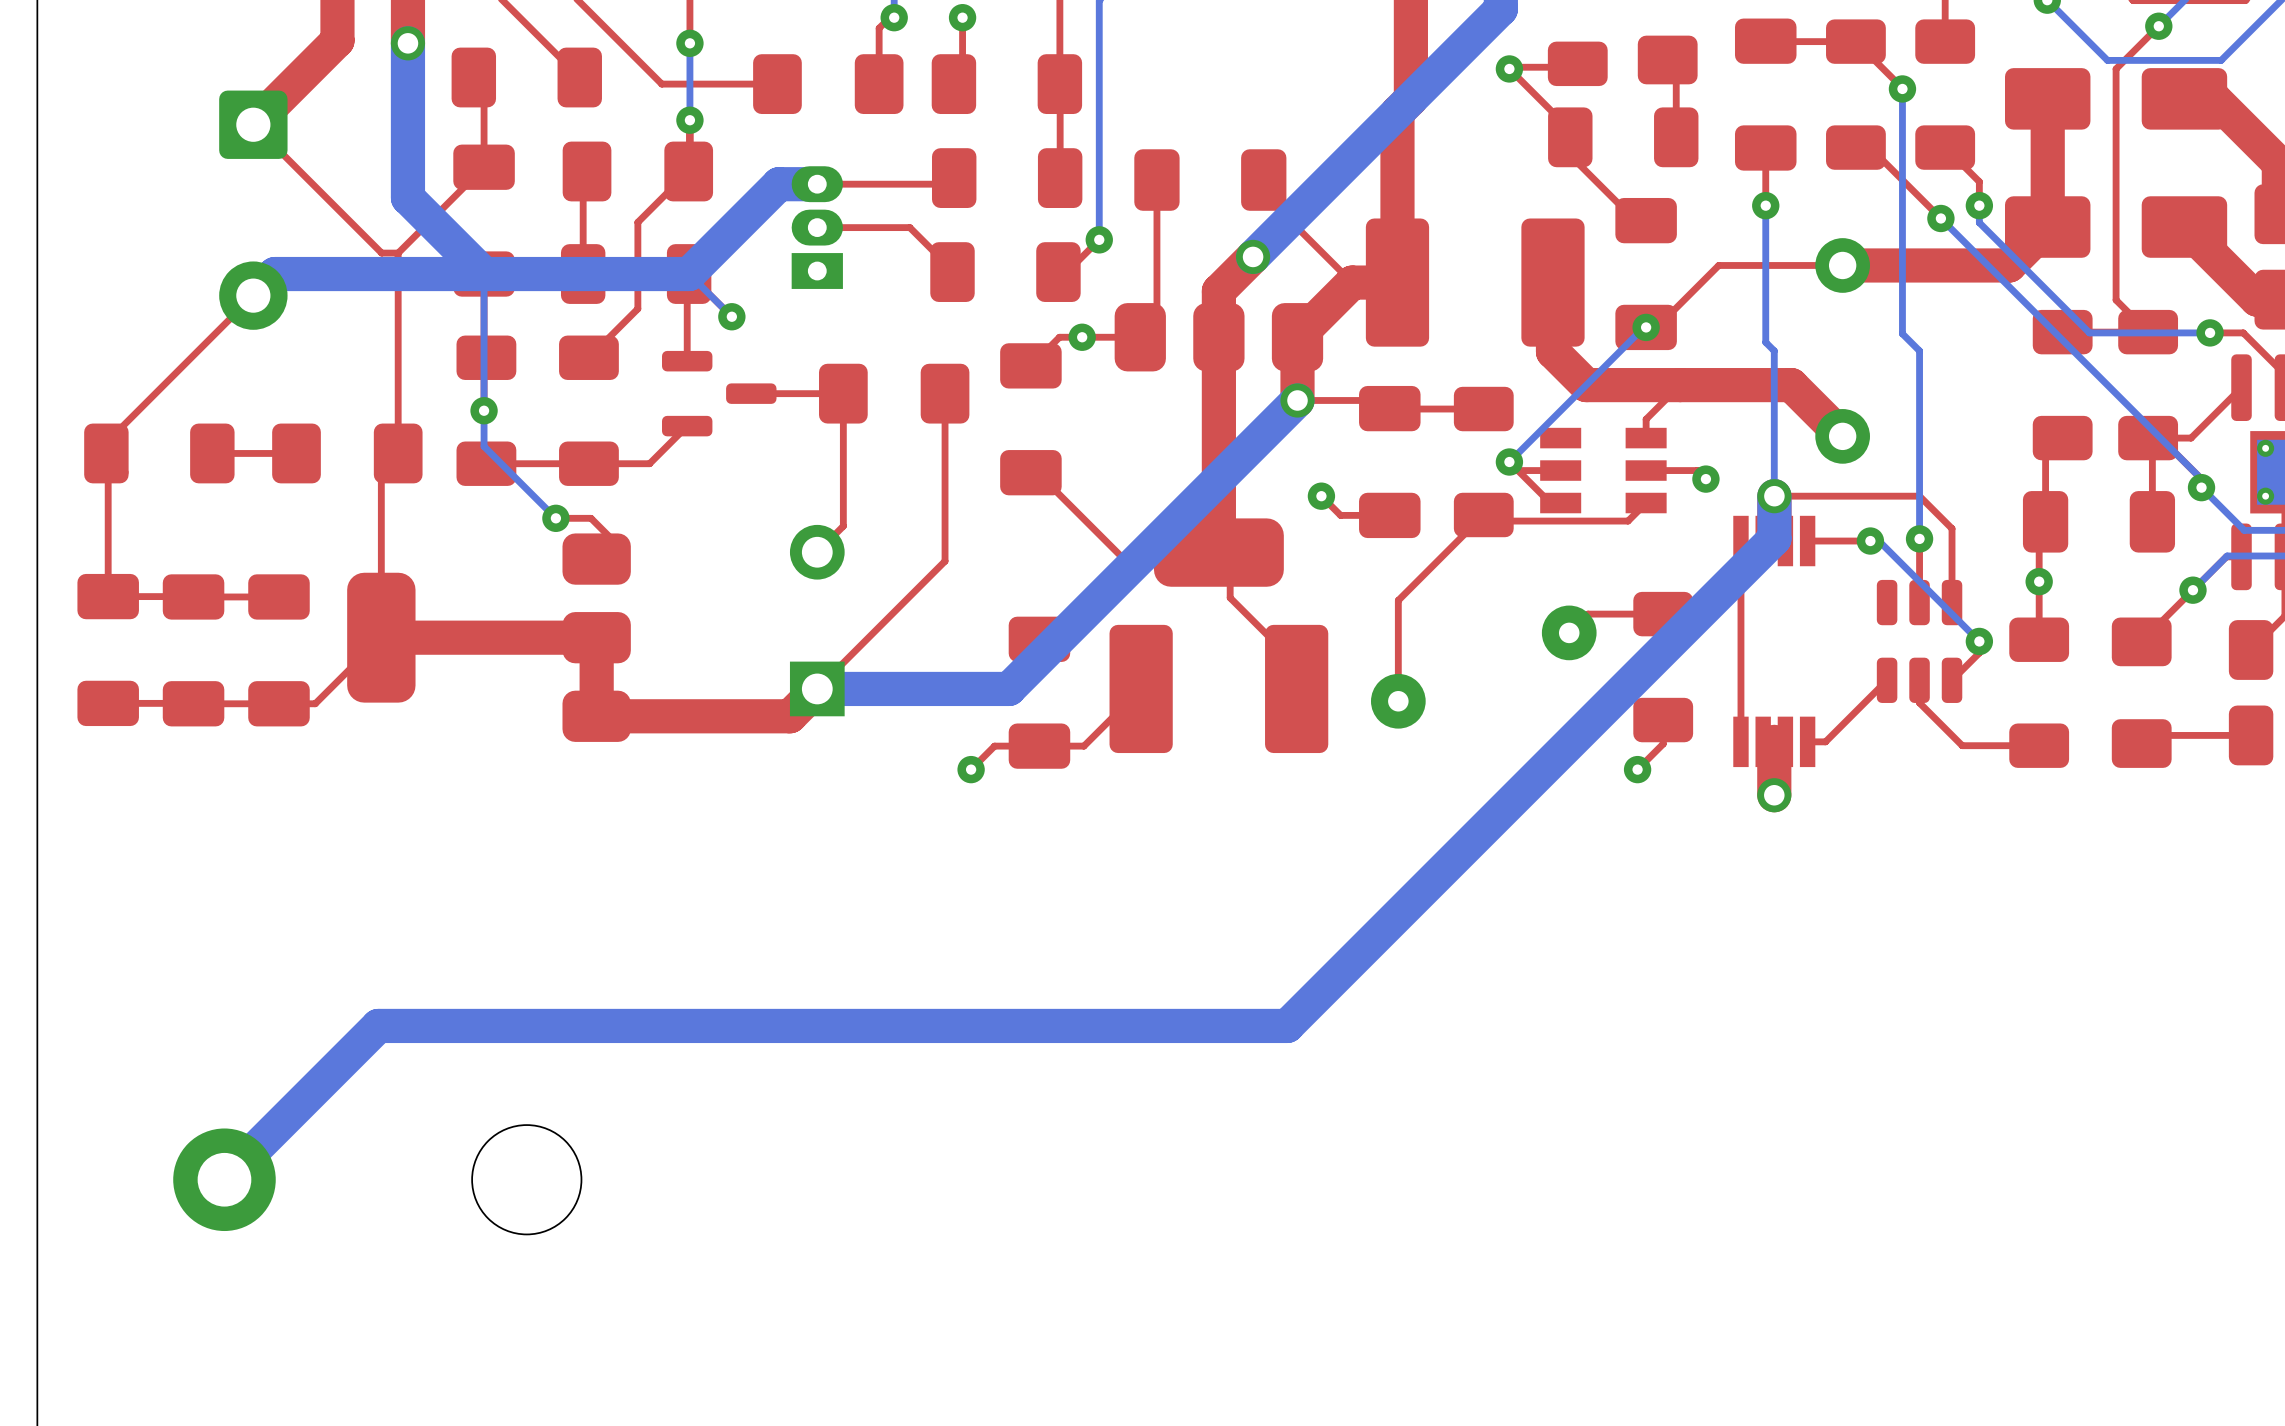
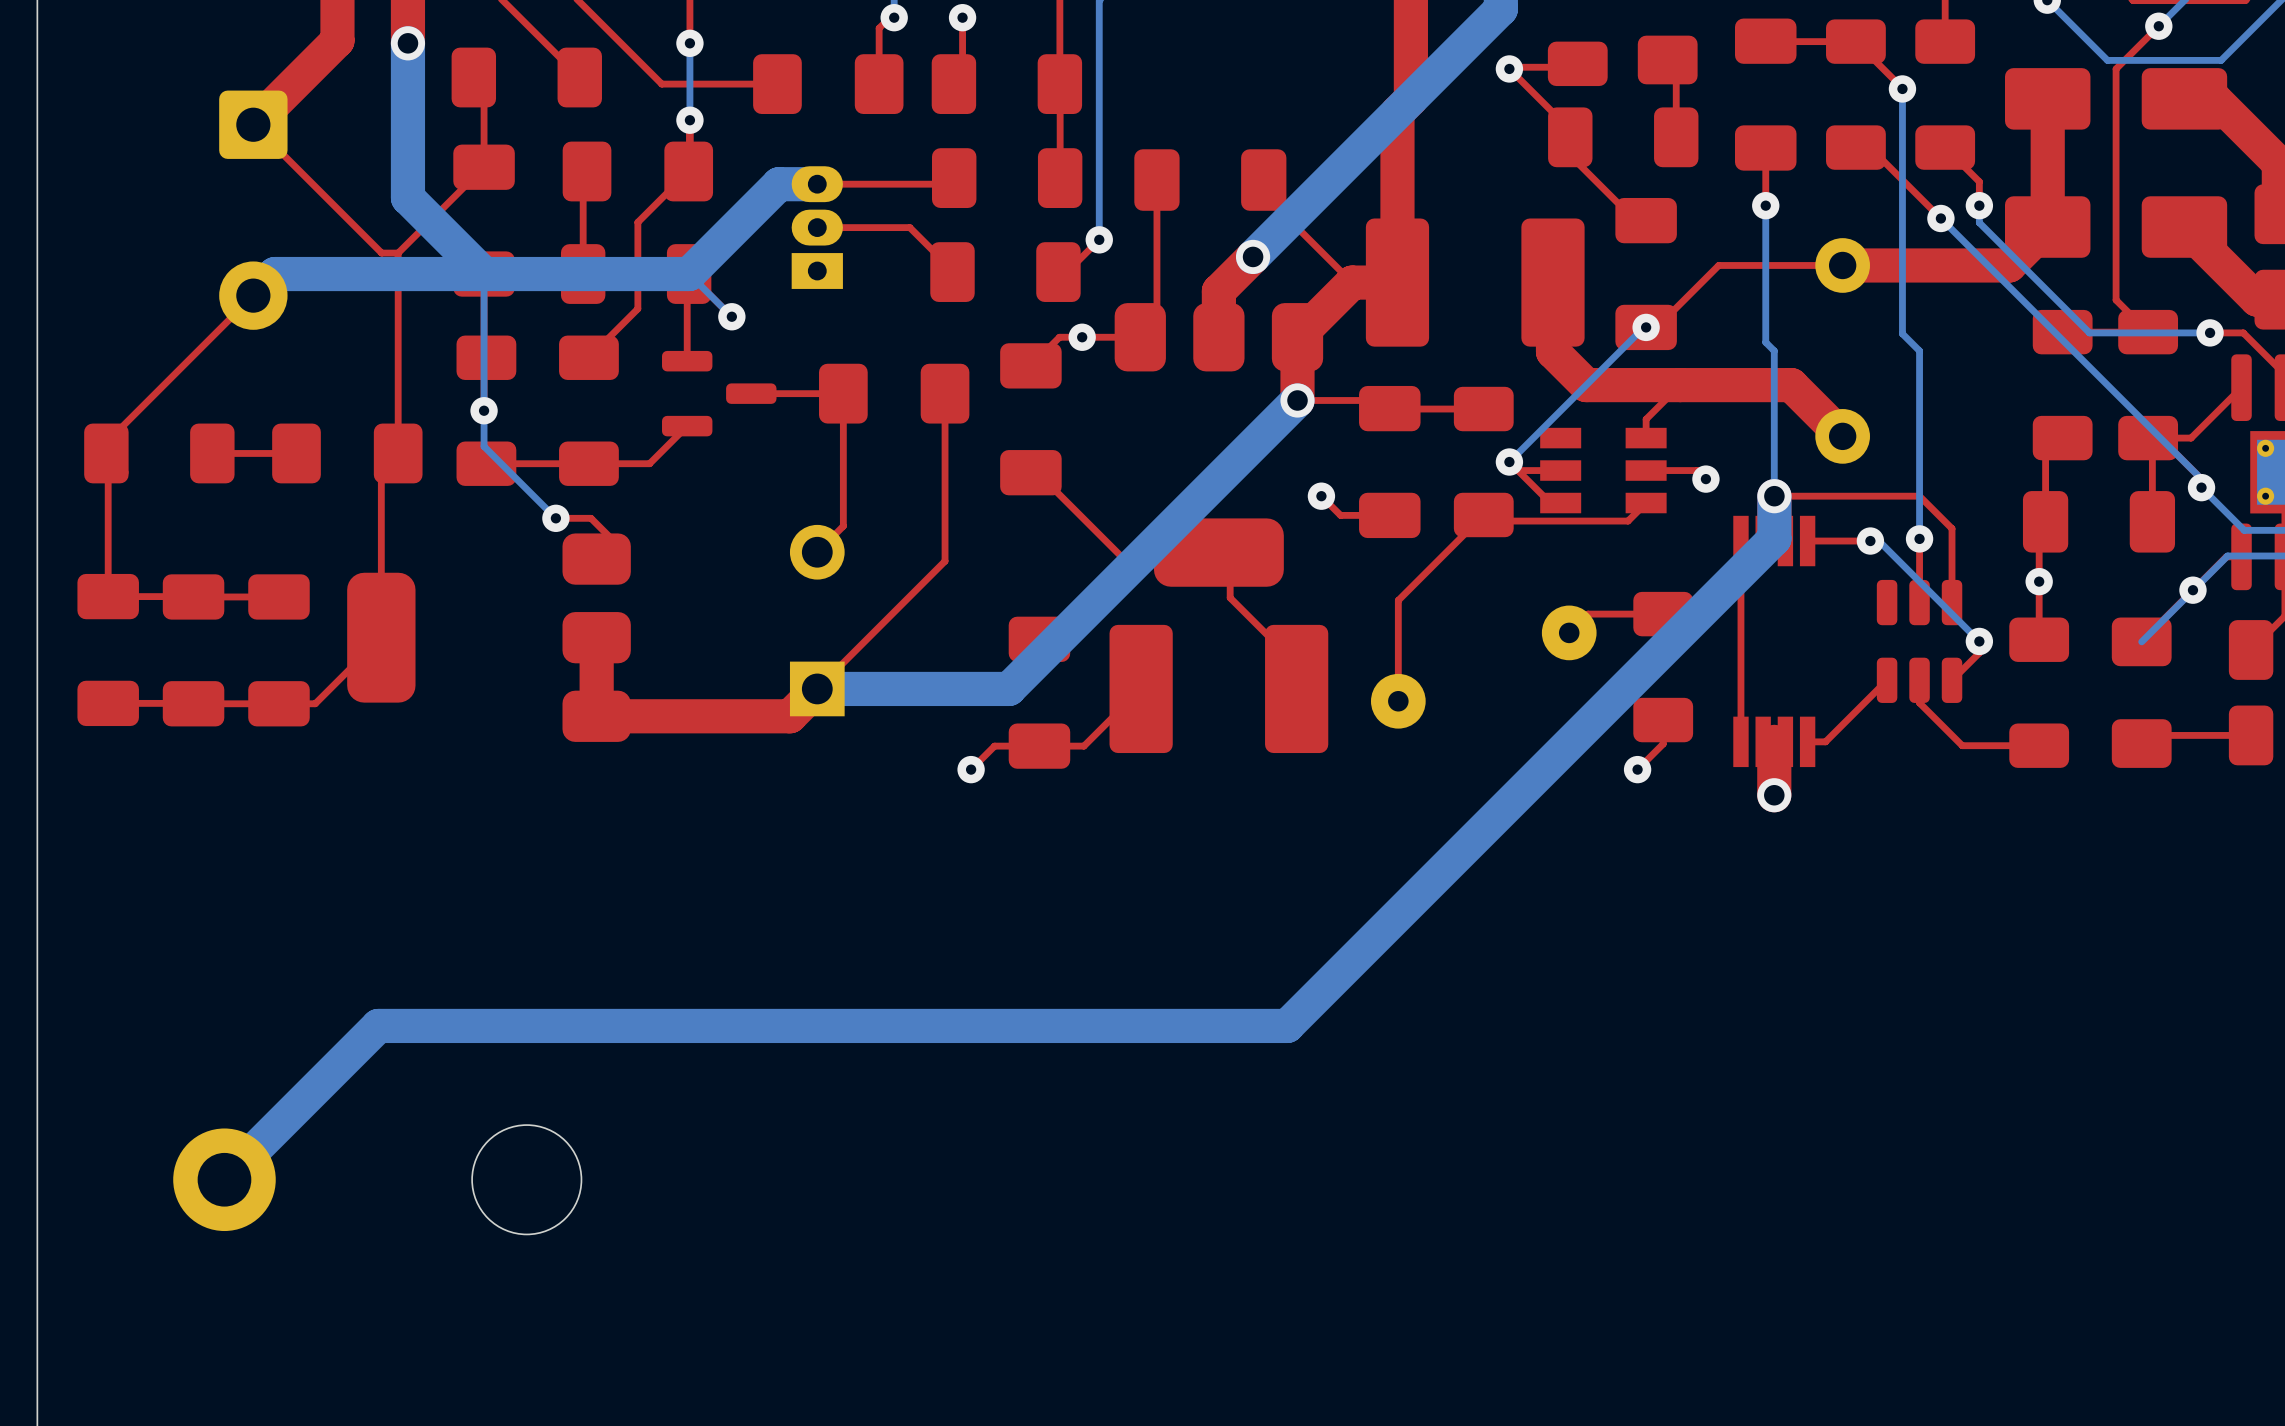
top track: (1218, 337) (1218, 552) -> none
bottom track: (2227, 556) (2192, 590) -> (2227, 556) (2141, 641)
top track: (596, 637) (381, 637) -> none

